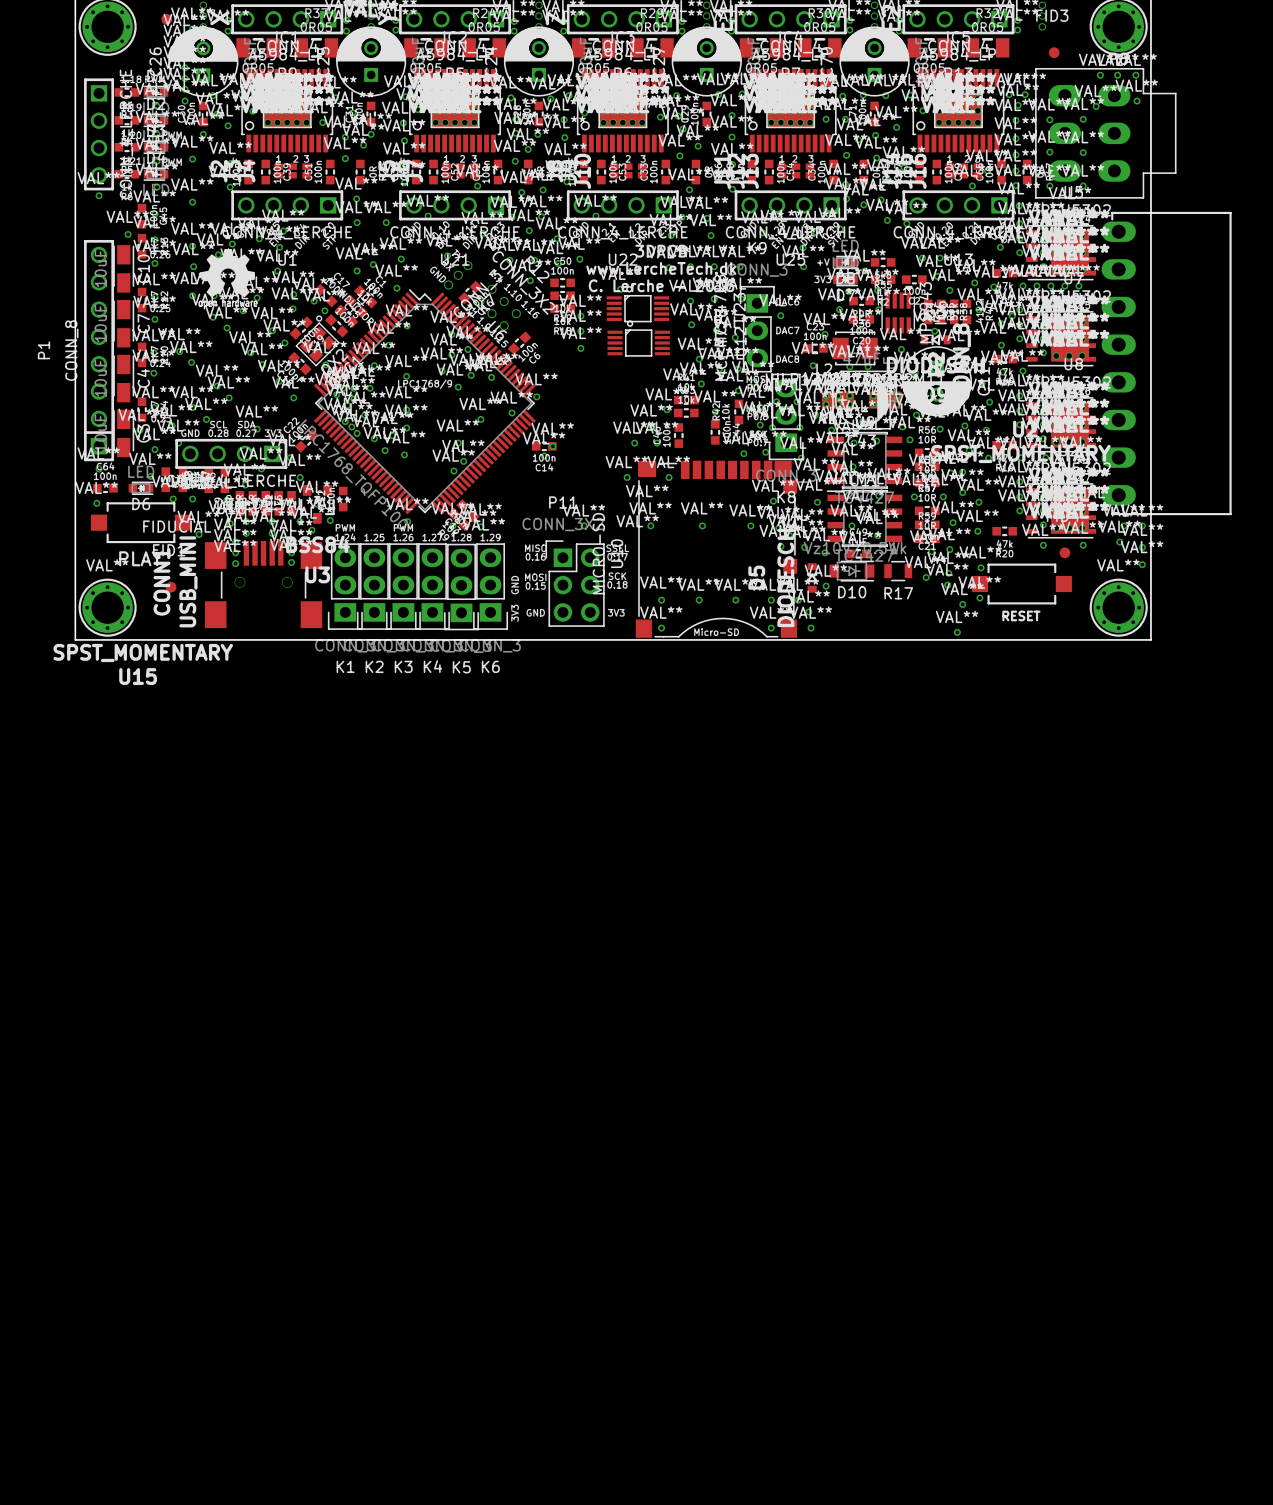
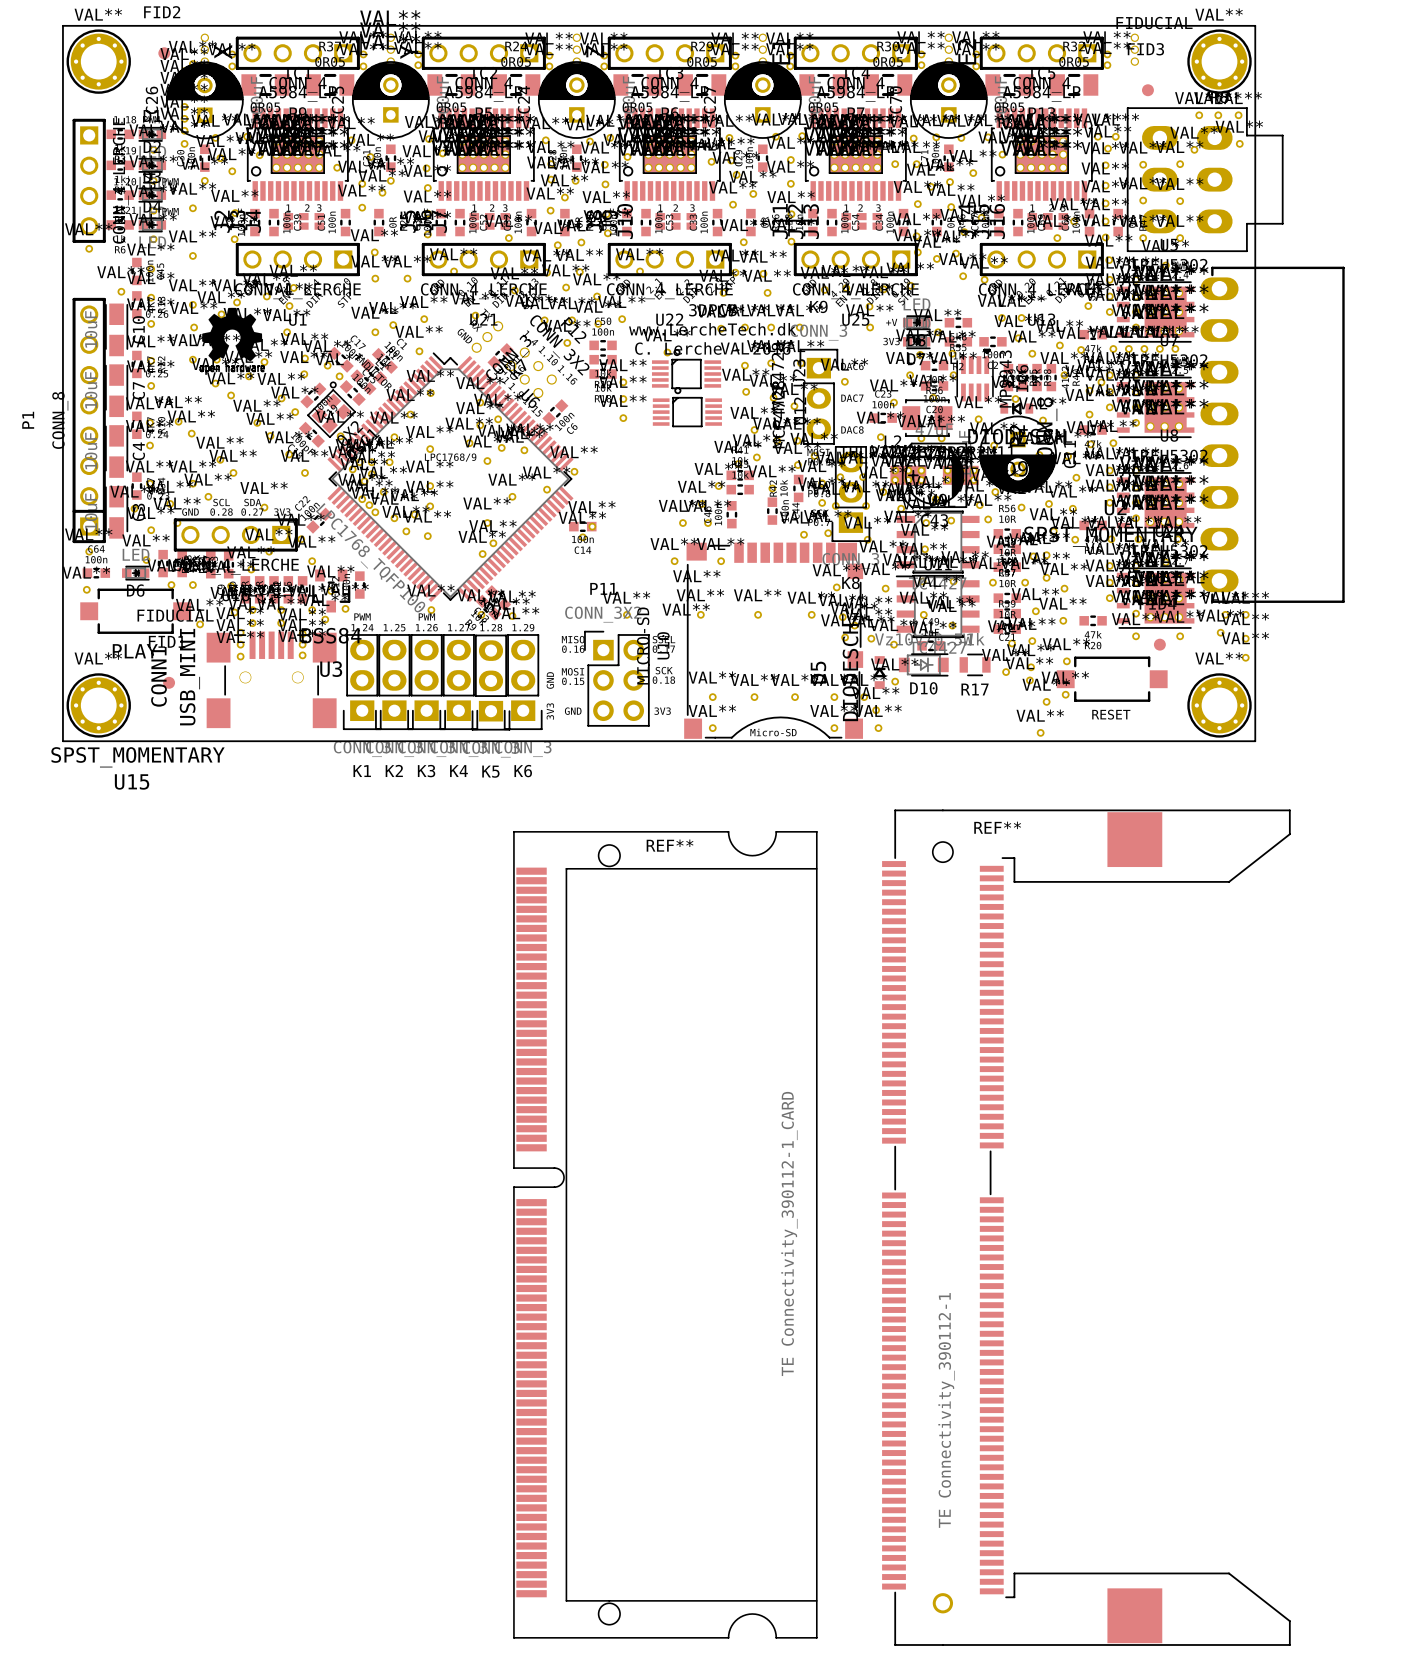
REF**: none -> TE Connectivity_390112-1 (1086, 1227)
REF**: none -> TE Connectivity_390112-1_CARD (665, 1234)

